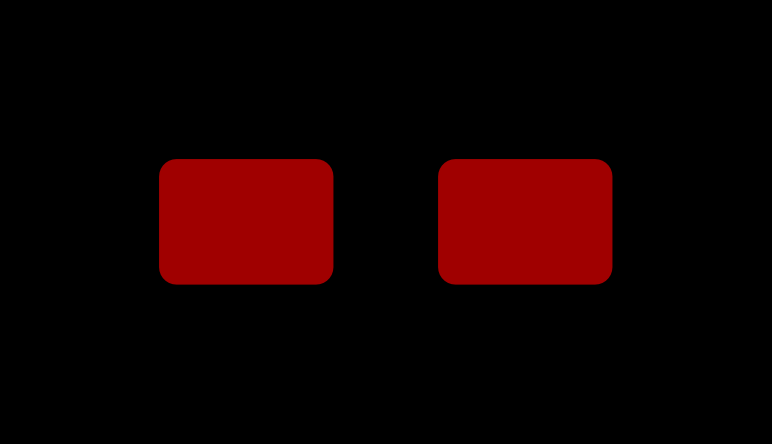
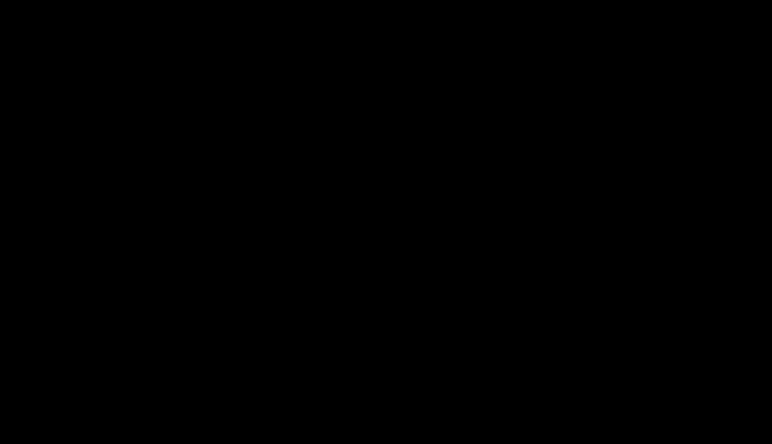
part: (385, 221) -> none

